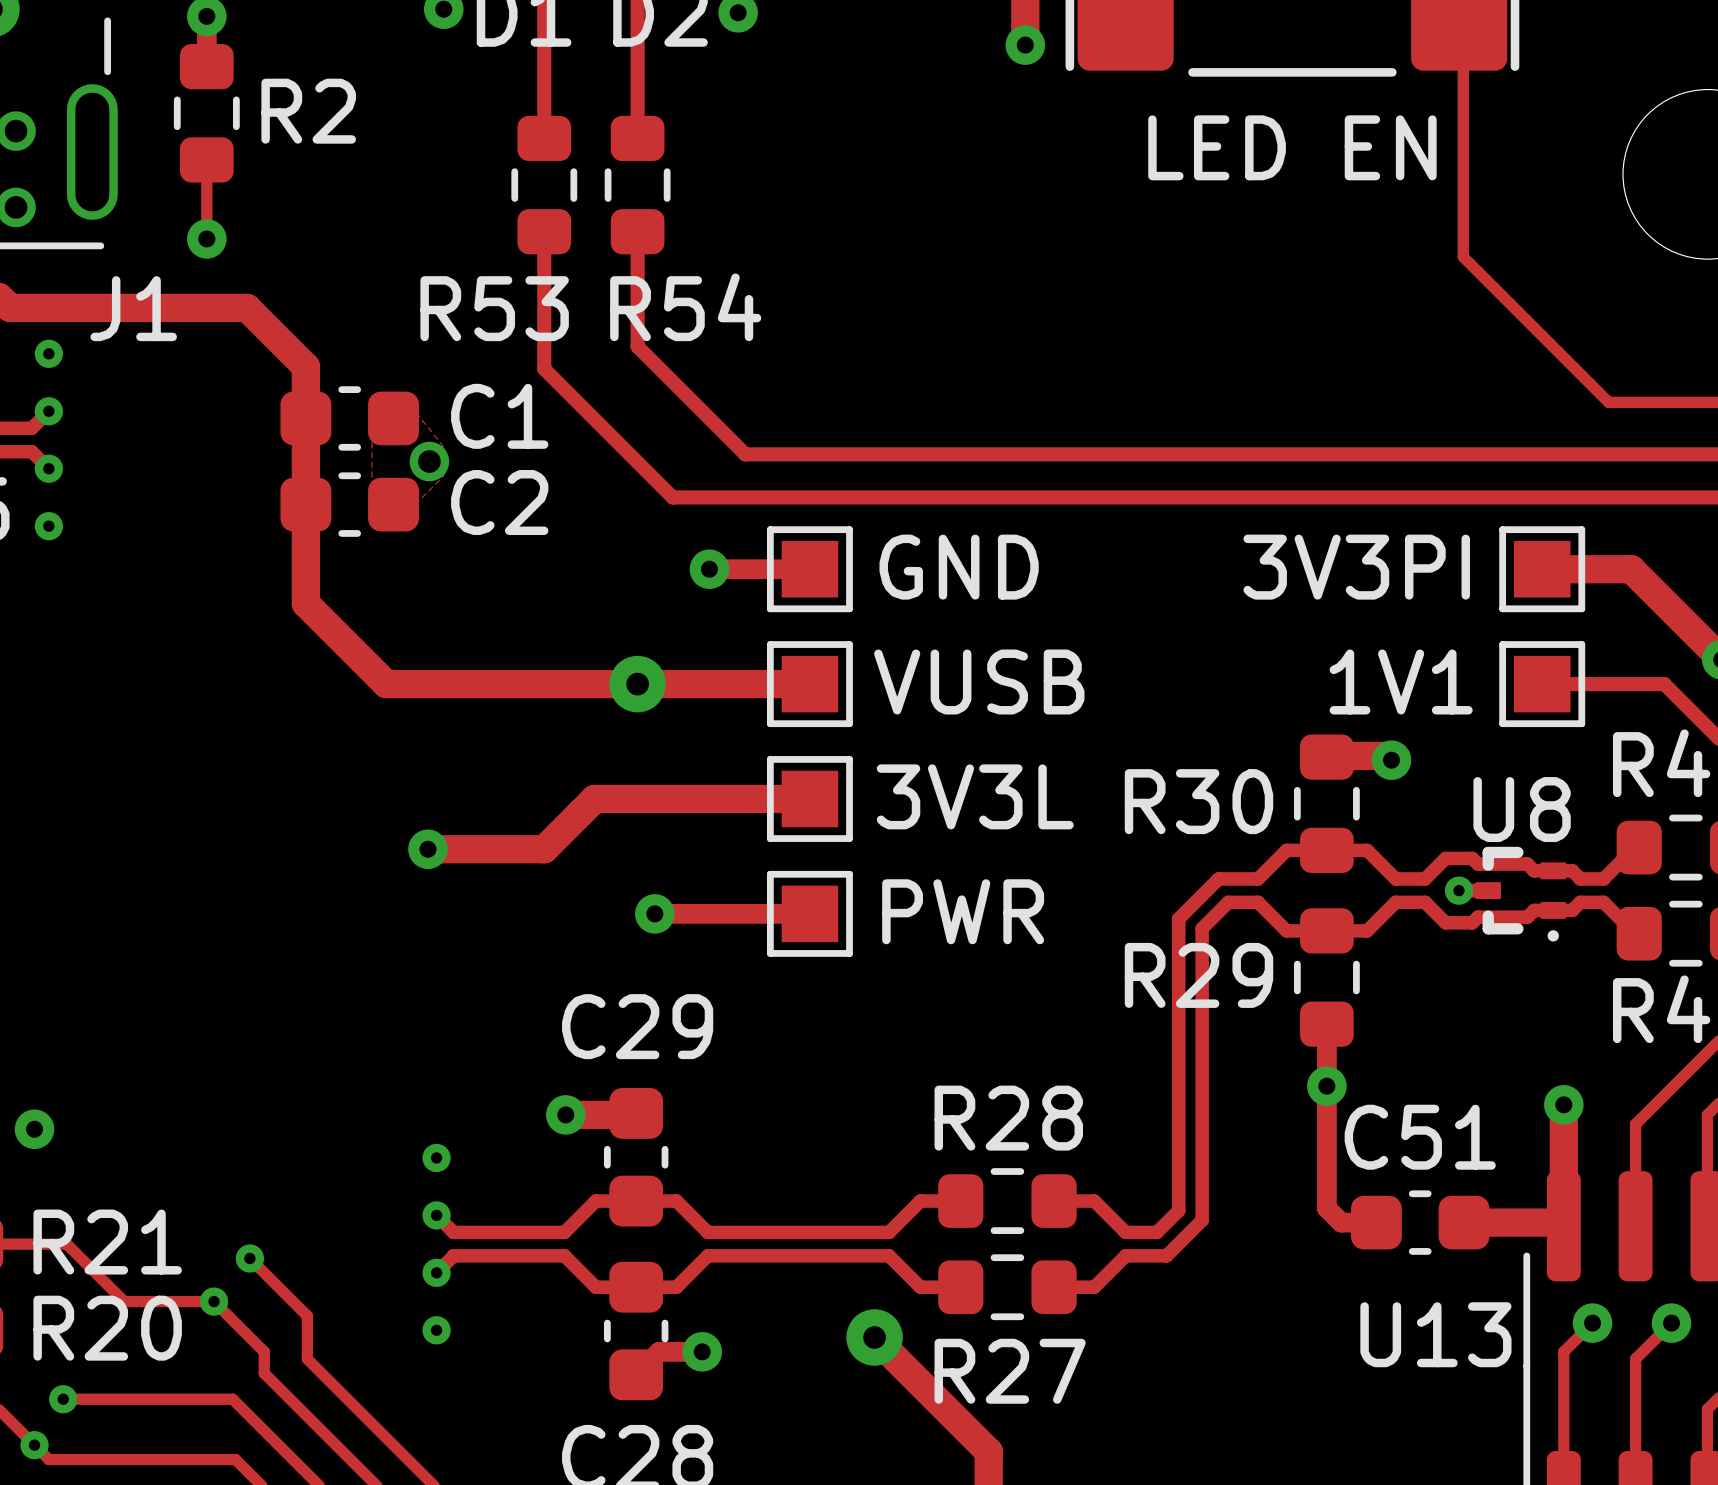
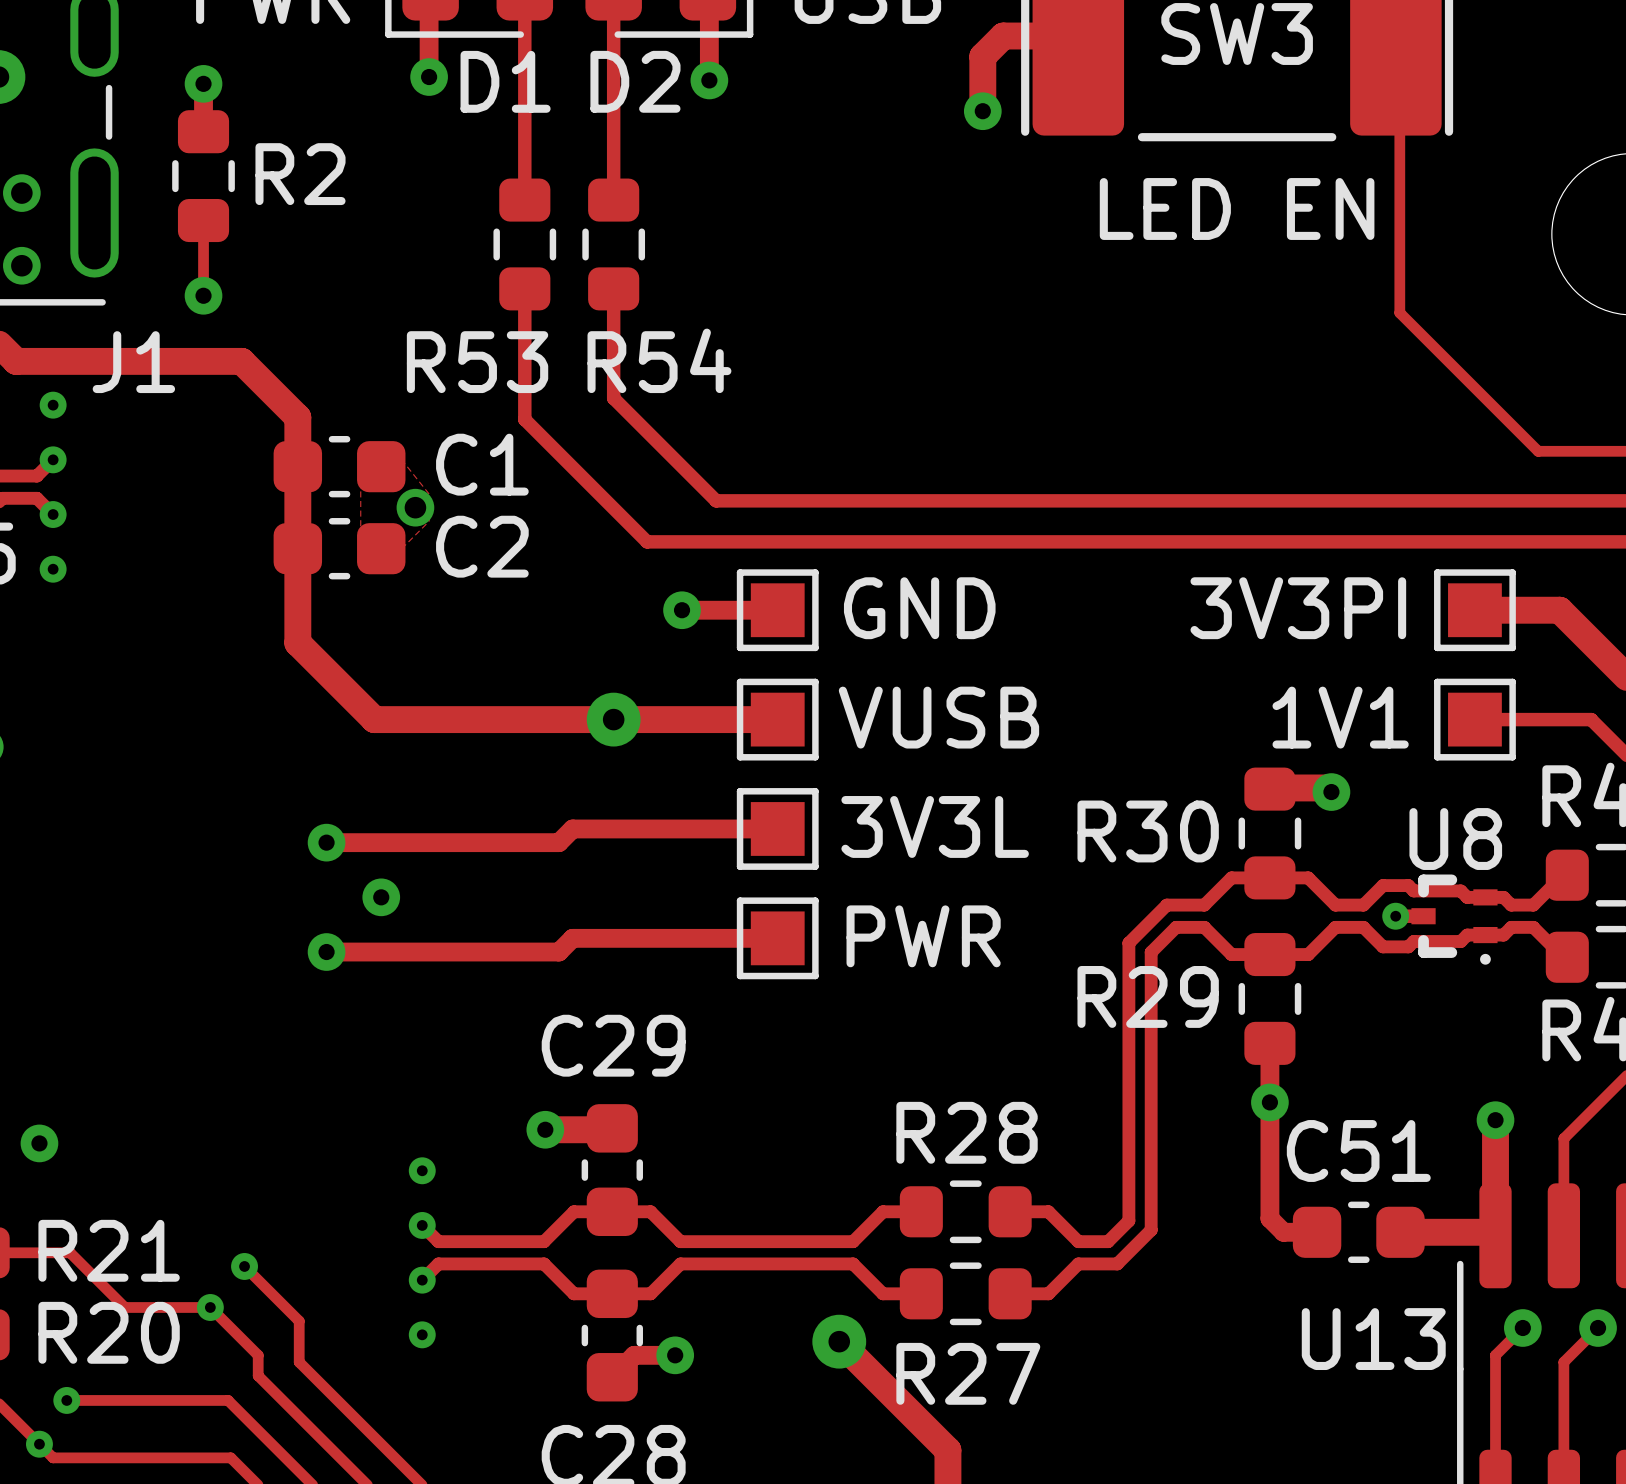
track width: thick (809, 798) (594, 798) (580, 813) -> thin (777, 828) (572, 828) (558, 842)
via: none -> (326, 842)
track: (580, 813) (544, 849) (427, 849) -> (558, 842) (326, 842)
via position: (427, 849) -> (381, 897)
track: none -> (630, 938) (572, 938) (558, 952) (326, 952)
via: (654, 913) -> none
via: none -> (326, 952)

